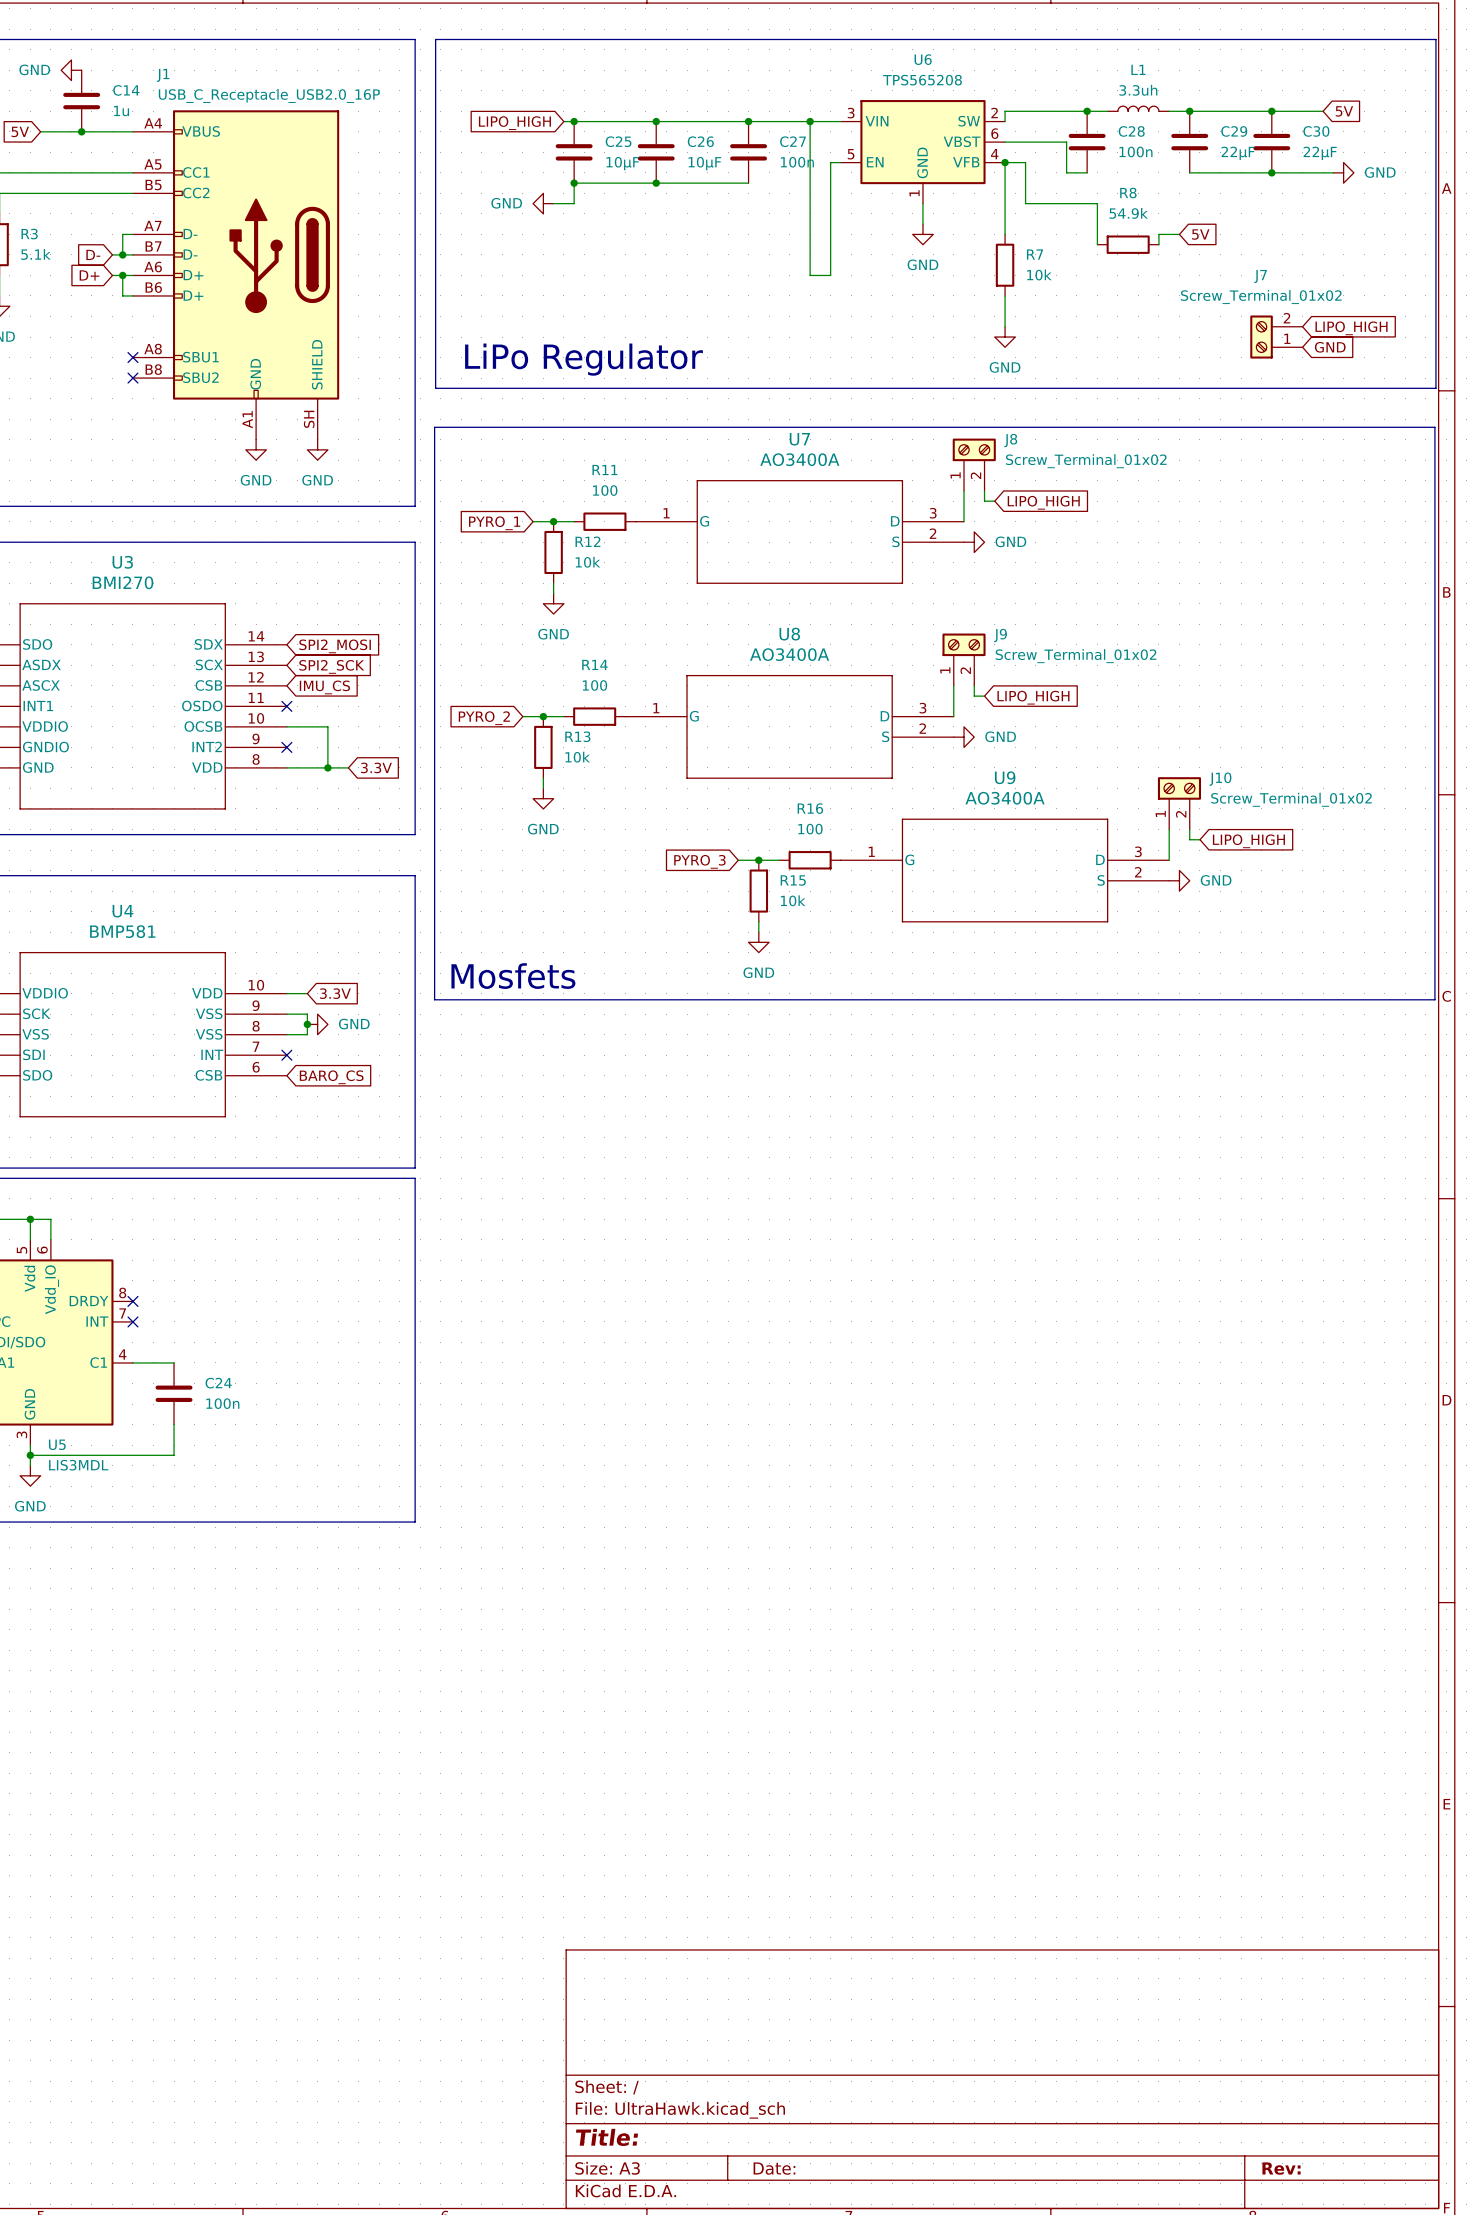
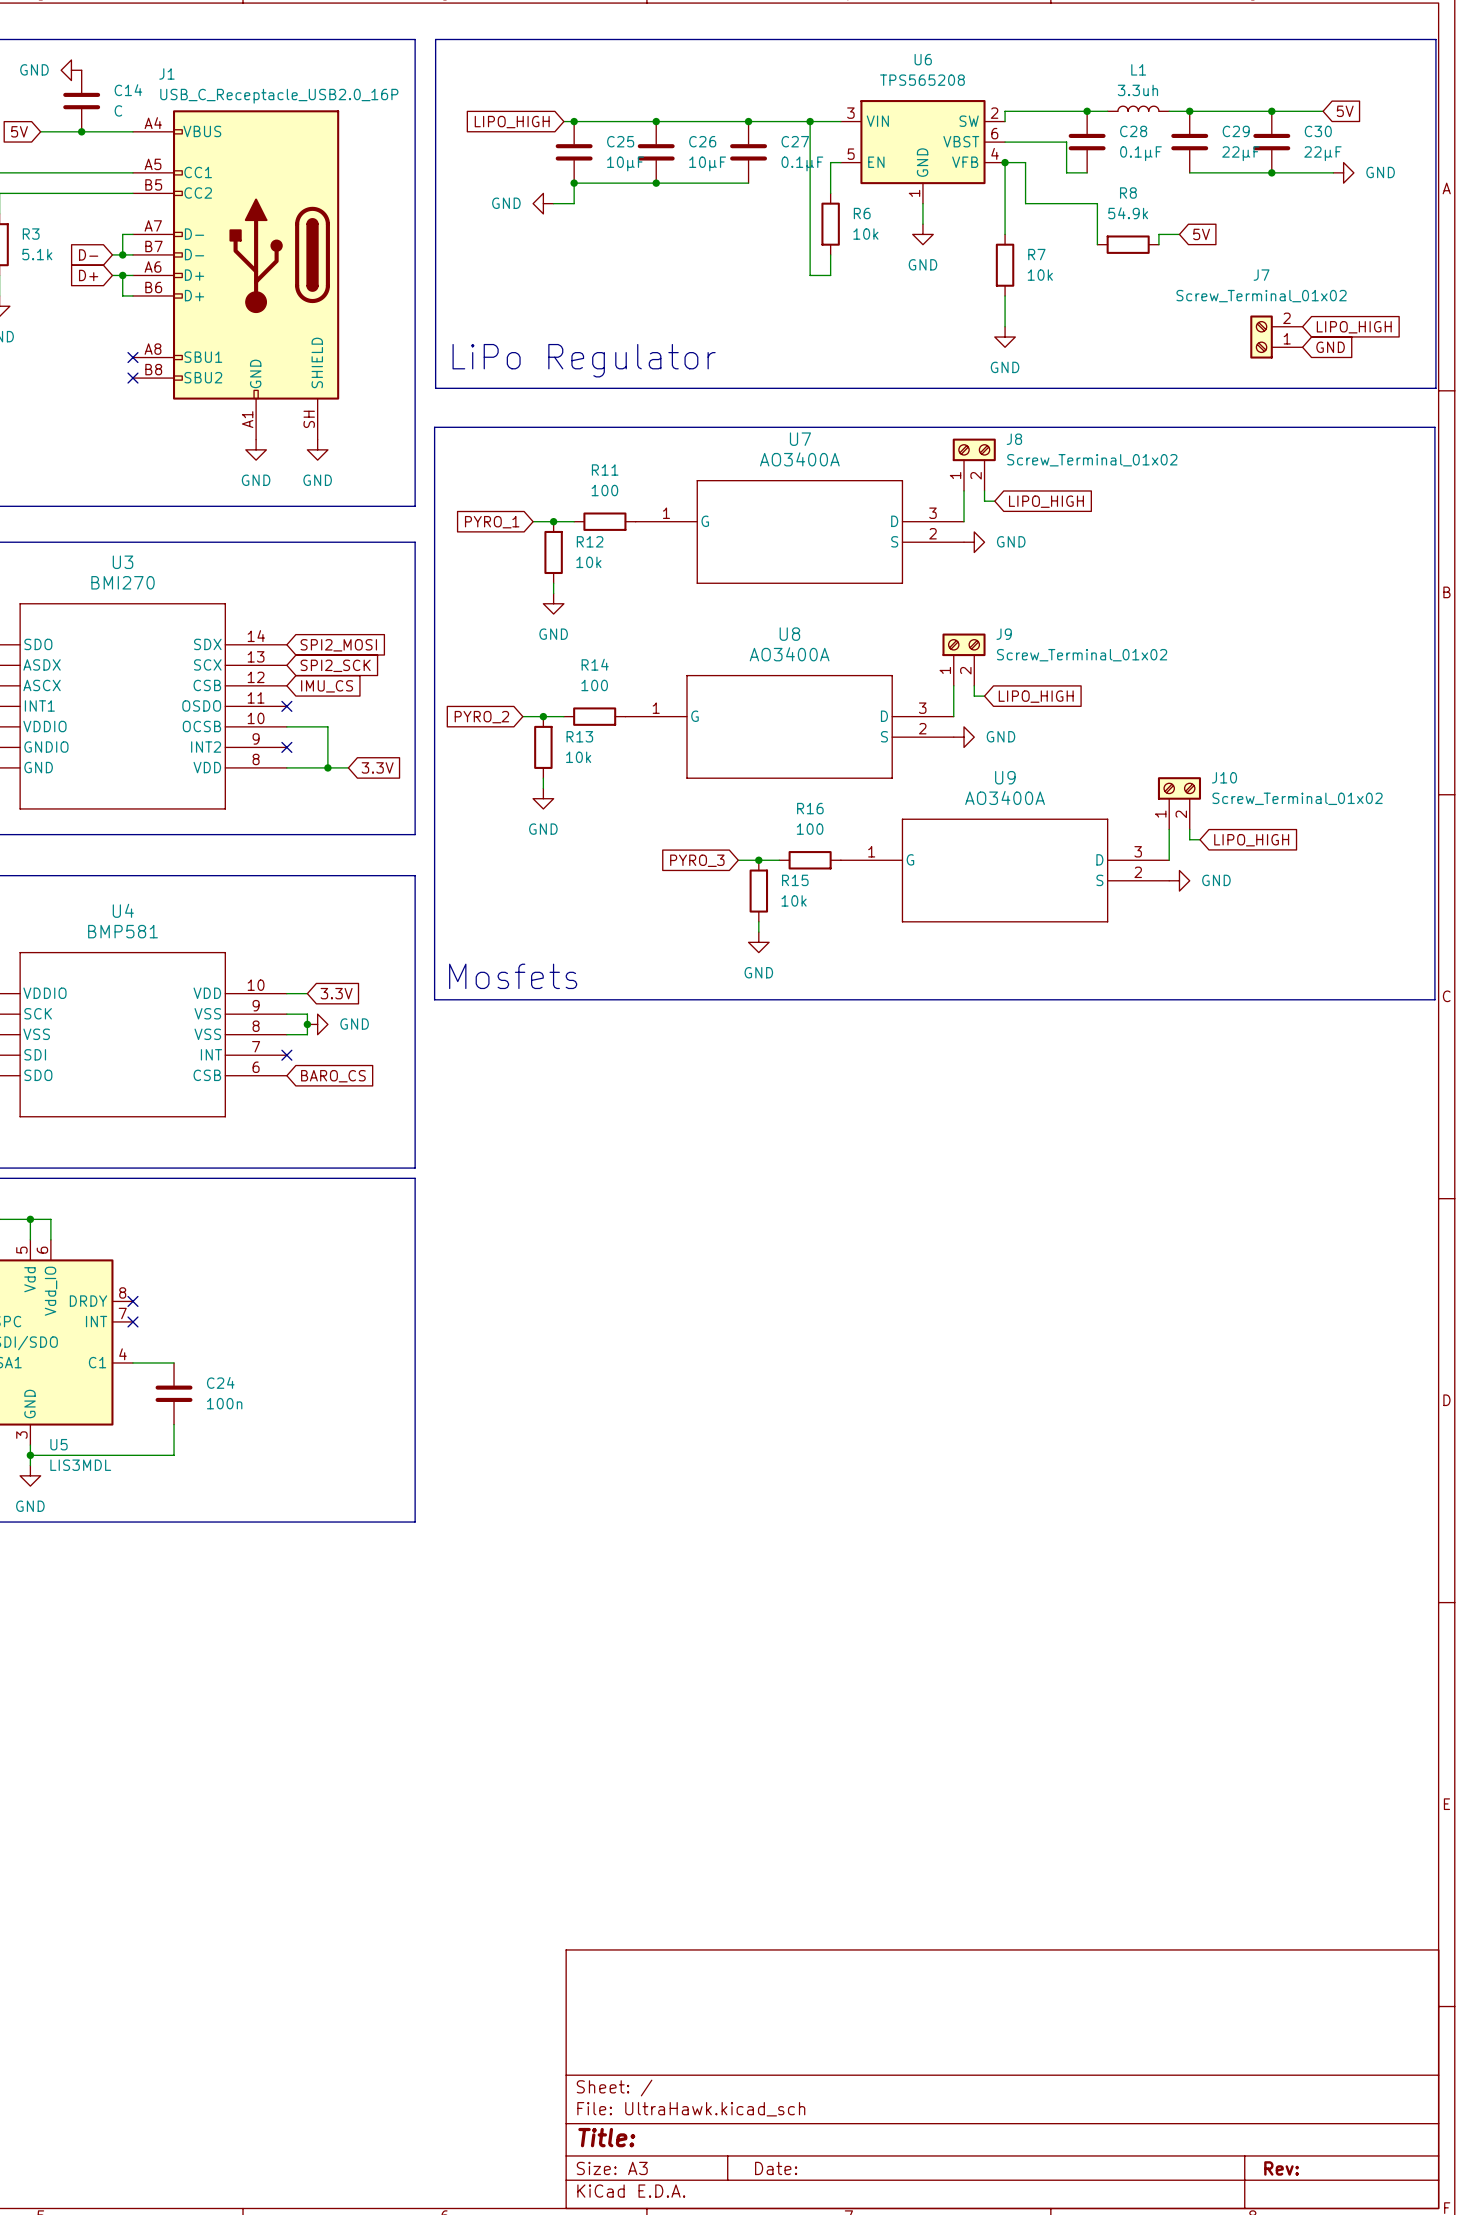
C14 value: 1u (121, 111) -> C (118, 110)
C28 value: 100n (1135, 151) -> 0.1µF (1140, 153)
C27 value: 100n (797, 162) -> 0.1µF (802, 163)
wire: (830, 193) (830, 254) -> none
R6: none -> 10k (830, 224)

